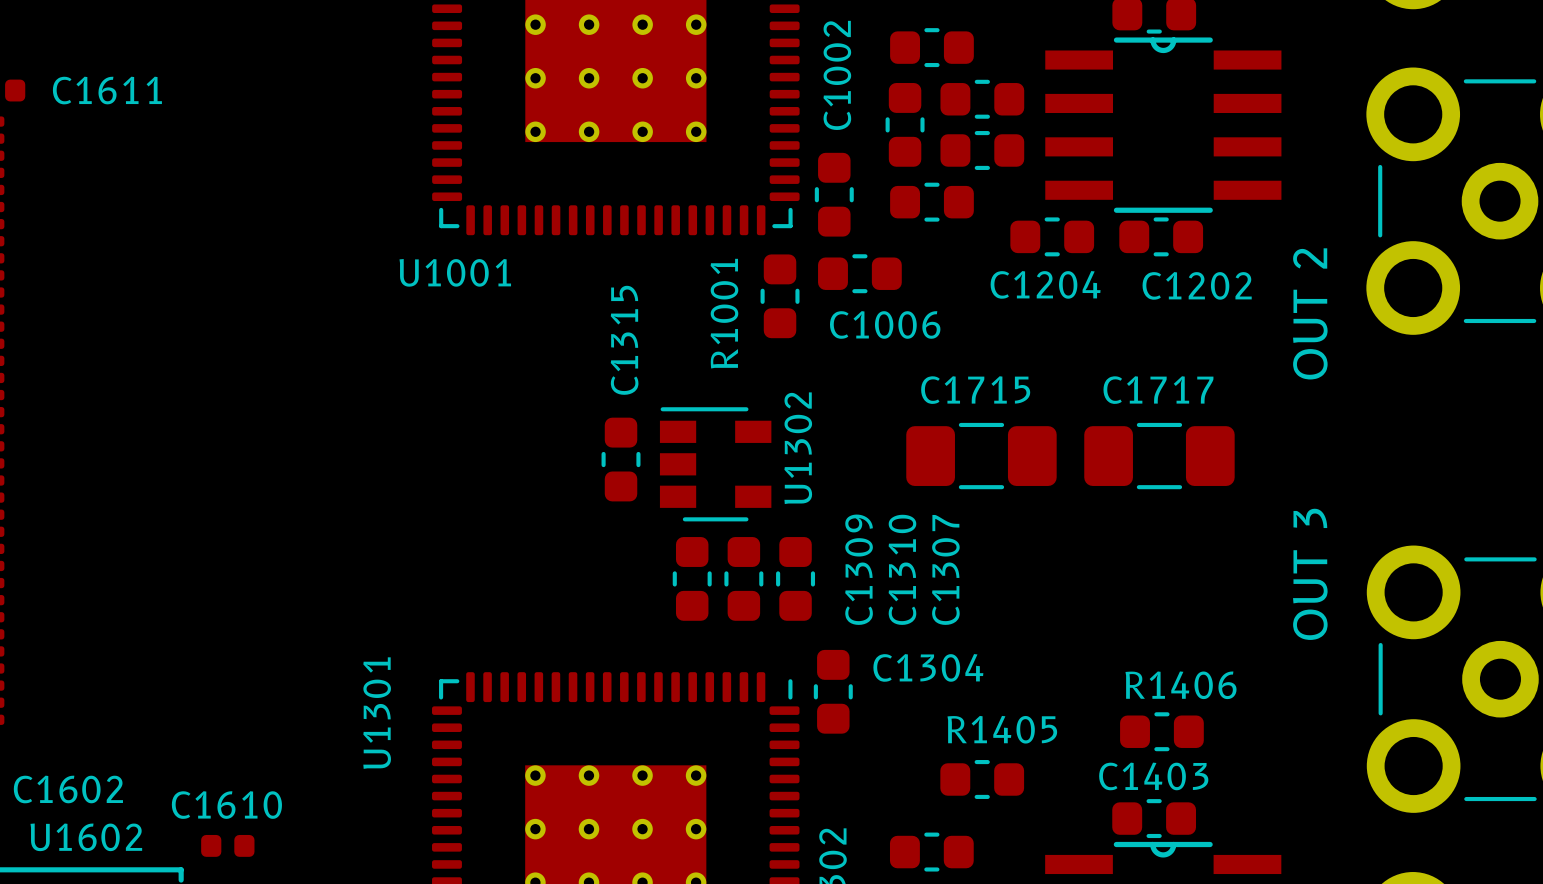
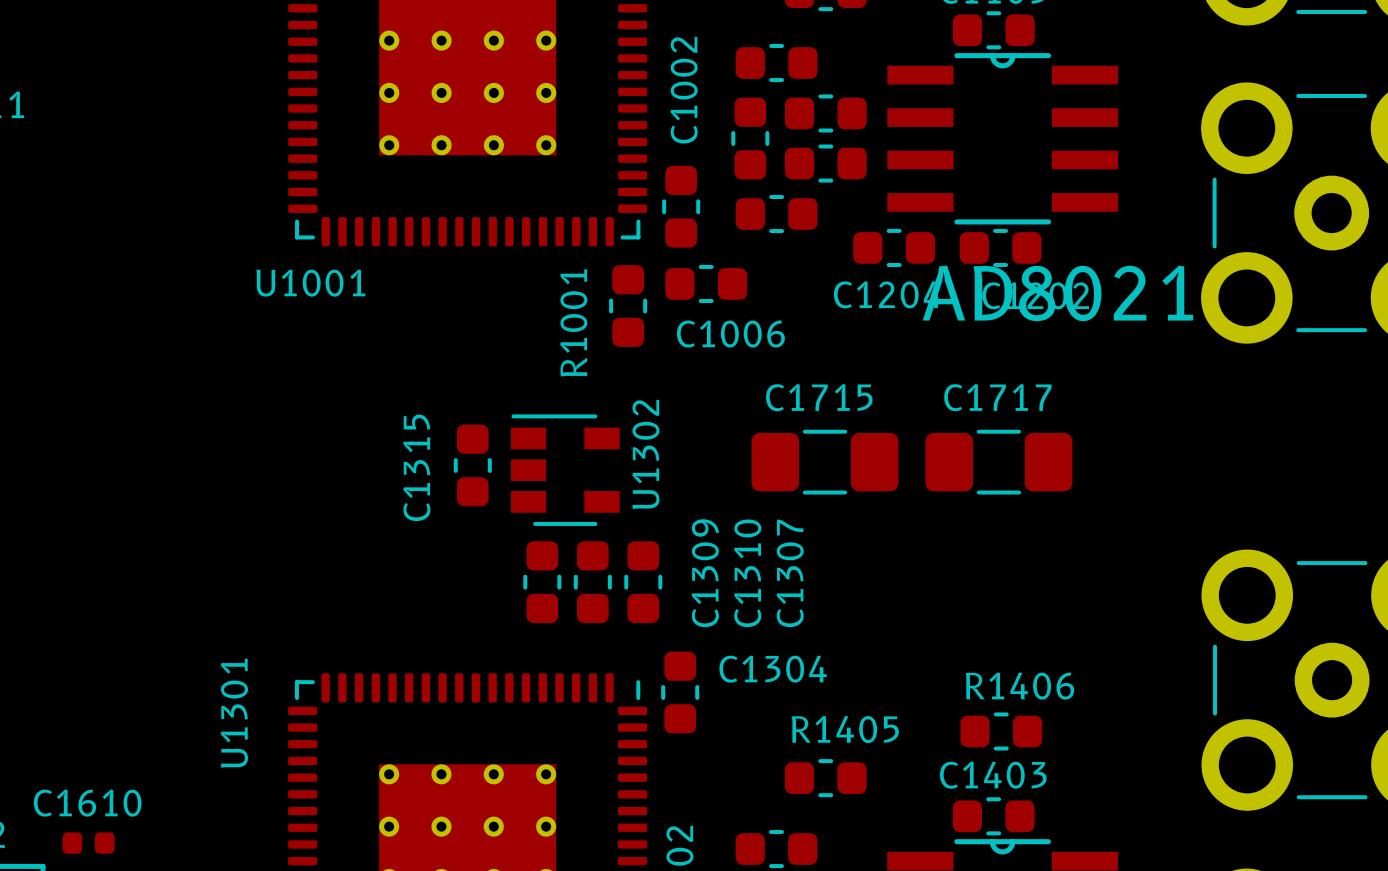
part value: none -> AD8021 (1057, 293)
text: OUT 2 (1310, 313) -> none
C1315 name position: C1315 (624, 340) -> C1315 (416, 467)
text: OUT 3 (1310, 574) -> none

